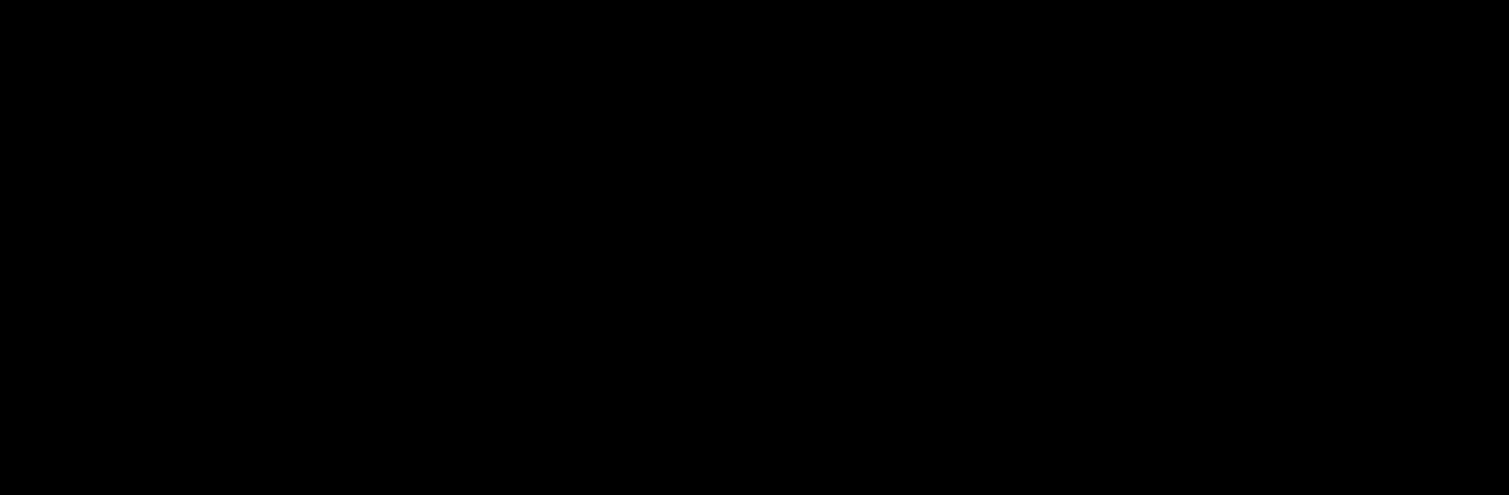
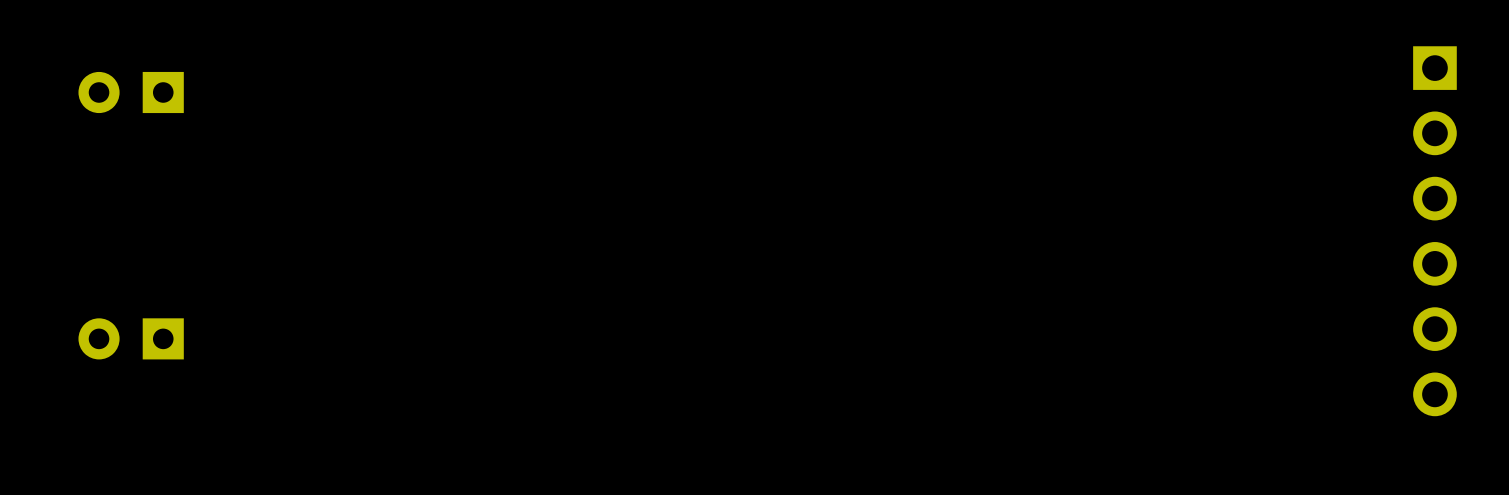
part: none -> (131, 92)
part: none -> (1434, 231)
part: none -> (131, 338)

